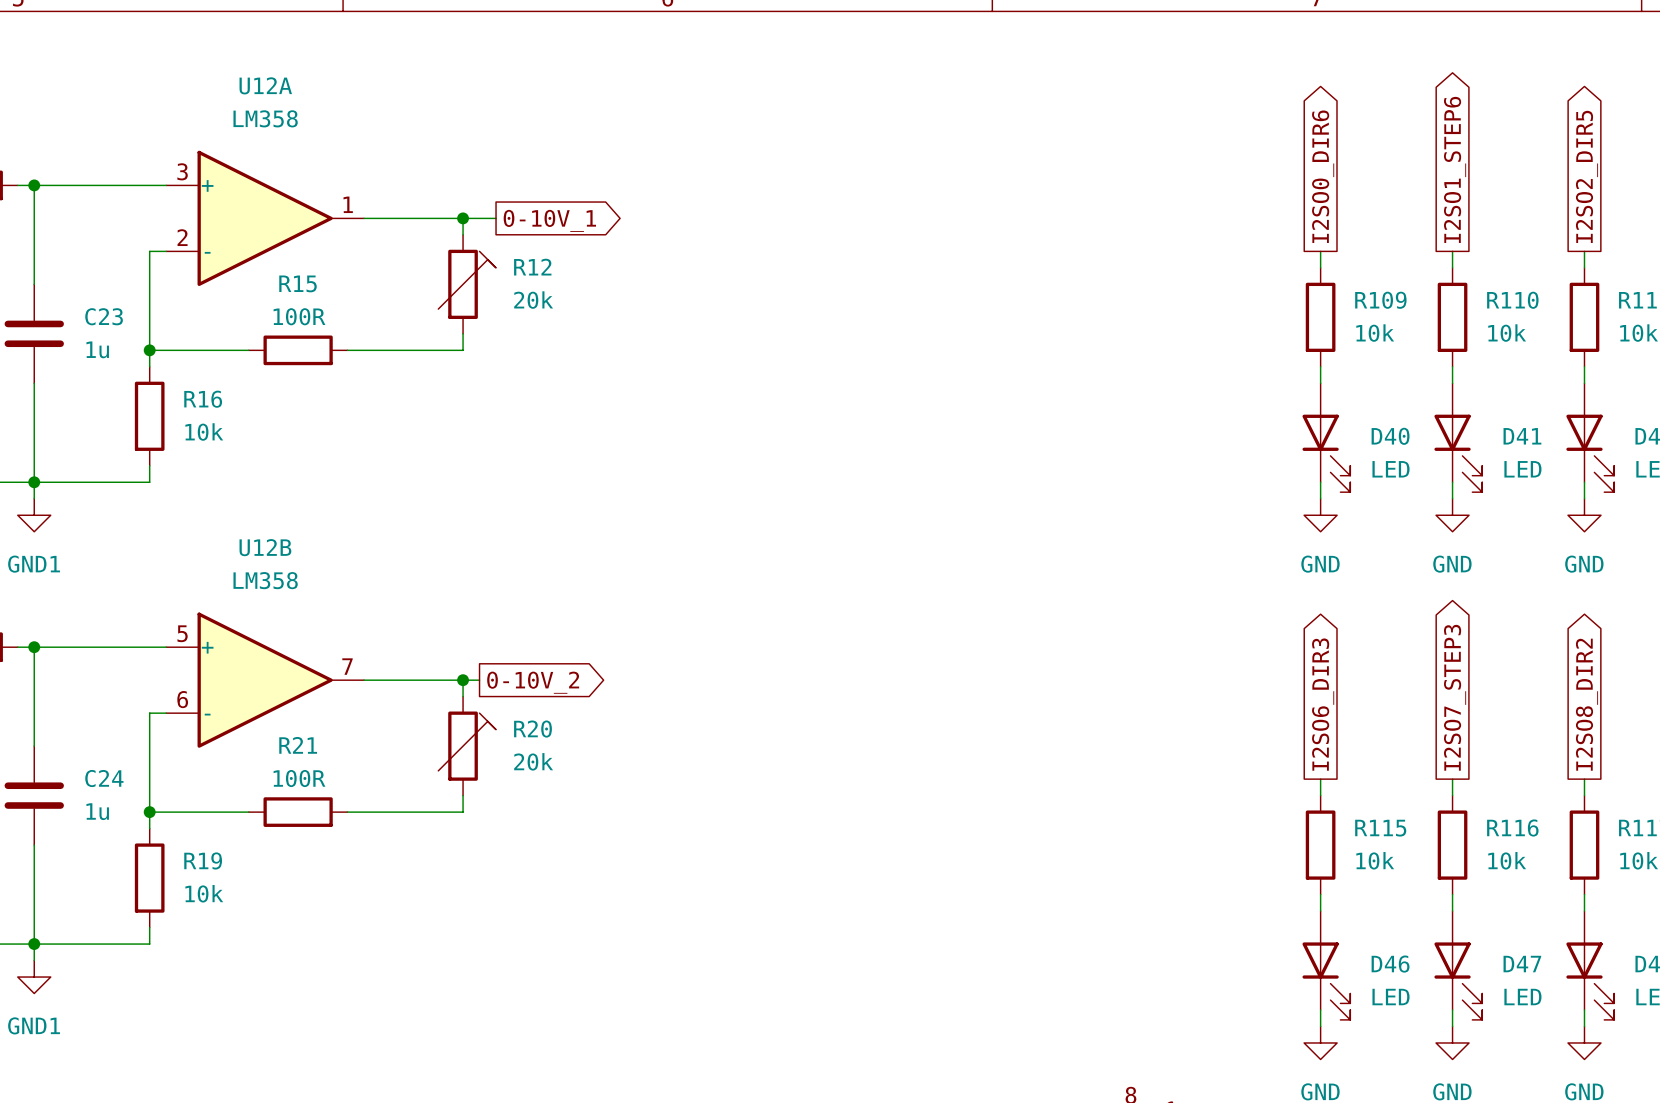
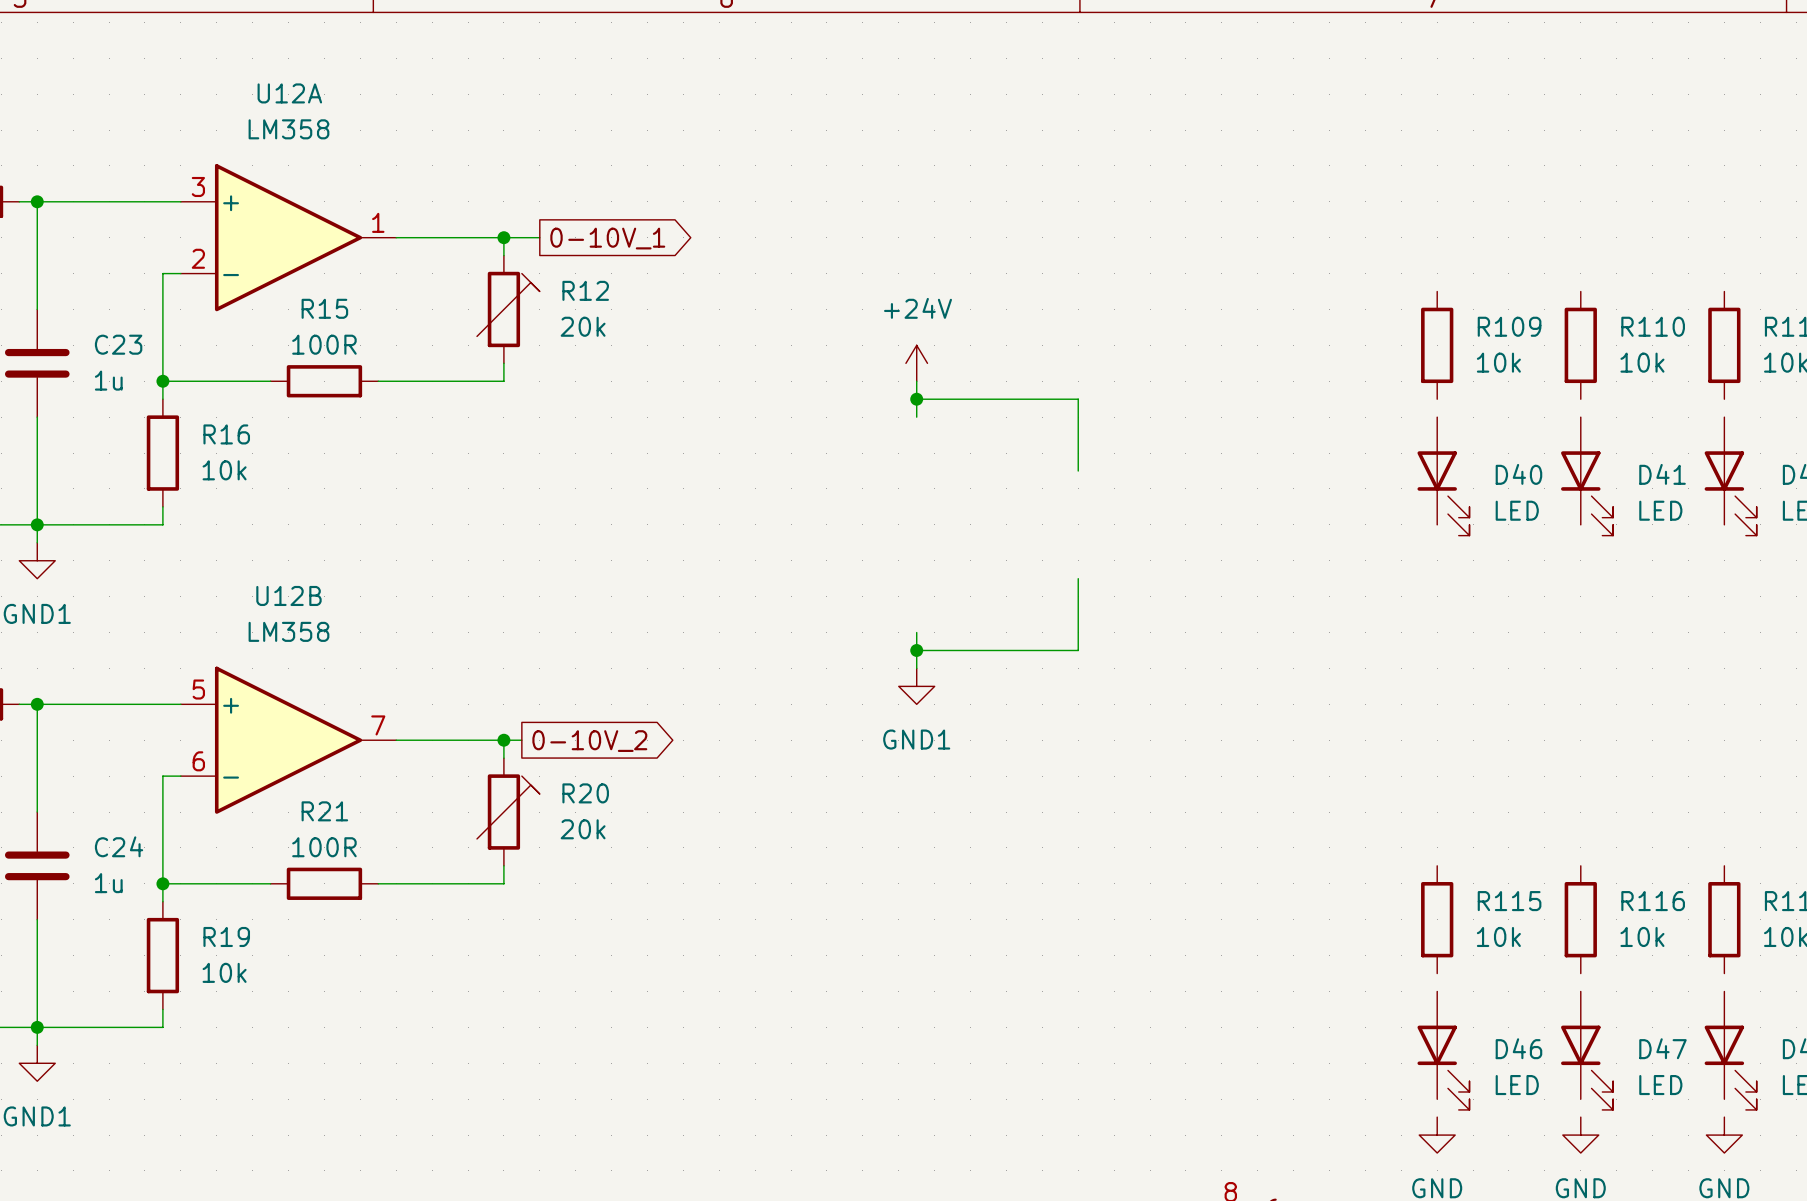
global label: I2SO1_STEP6 (1455, 169) -> none
global label: I2SO0_DIR6 (1323, 176) -> none
global label: I2SO2_DIR5 (1587, 176) -> none
wire: (1320, 251) (1320, 267) -> none
wire: (1452, 251) (1452, 267) -> none
wire: (1584, 251) (1584, 267) -> none
power symbol: none -> +24V (916, 363)
wire: none -> (916, 381) (916, 417)
wire: none -> (916, 399) (1078, 399) (1078, 471)
junction: none -> (916, 399)
wire: (1320, 366) (1320, 383) -> none
wire: (1452, 366) (1452, 383) -> none
wire: (1584, 366) (1584, 383) -> none
wire: (1320, 482) (1320, 498) -> none
wire: (1452, 482) (1452, 498) -> none
wire: (1584, 482) (1584, 498) -> none
power symbol: GND (1320, 515) -> none
power symbol: GND (1452, 515) -> none
power symbol: GND (1584, 515) -> none
wire: none -> (1078, 578) (1078, 650) (916, 650)
wire: none -> (916, 632) (916, 668)
junction: none -> (916, 650)
power symbol: none -> GND1 (916, 686)
global label: I2SO7_STEP3 (1455, 697) -> none
global label: I2SO6_DIR3 (1323, 704) -> none
global label: I2SO8_DIR2 (1587, 704) -> none
wire: (1320, 779) (1320, 795) -> none
wire: (1452, 779) (1452, 795) -> none
wire: (1584, 779) (1584, 795) -> none
wire: (1320, 894) (1320, 911) -> none
wire: (1452, 894) (1452, 911) -> none
wire: (1584, 894) (1584, 911) -> none
wire: (1320, 1010) (1320, 1026) -> none
wire: (1452, 1010) (1452, 1026) -> none
wire: (1584, 1010) (1584, 1026) -> none

